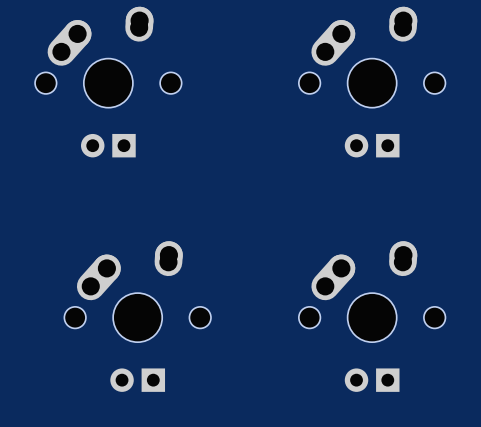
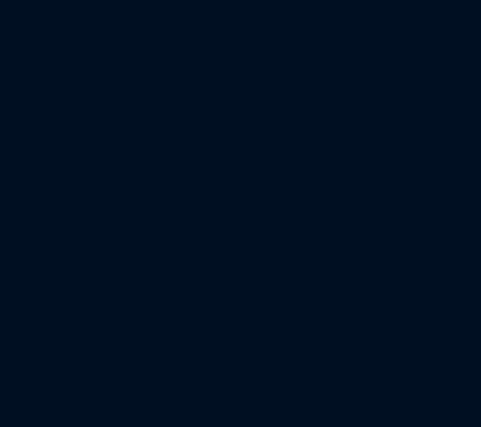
part: (108, 82) -> none
part: (372, 82) -> none
part: (137, 316) -> none
part: (372, 316) -> none

